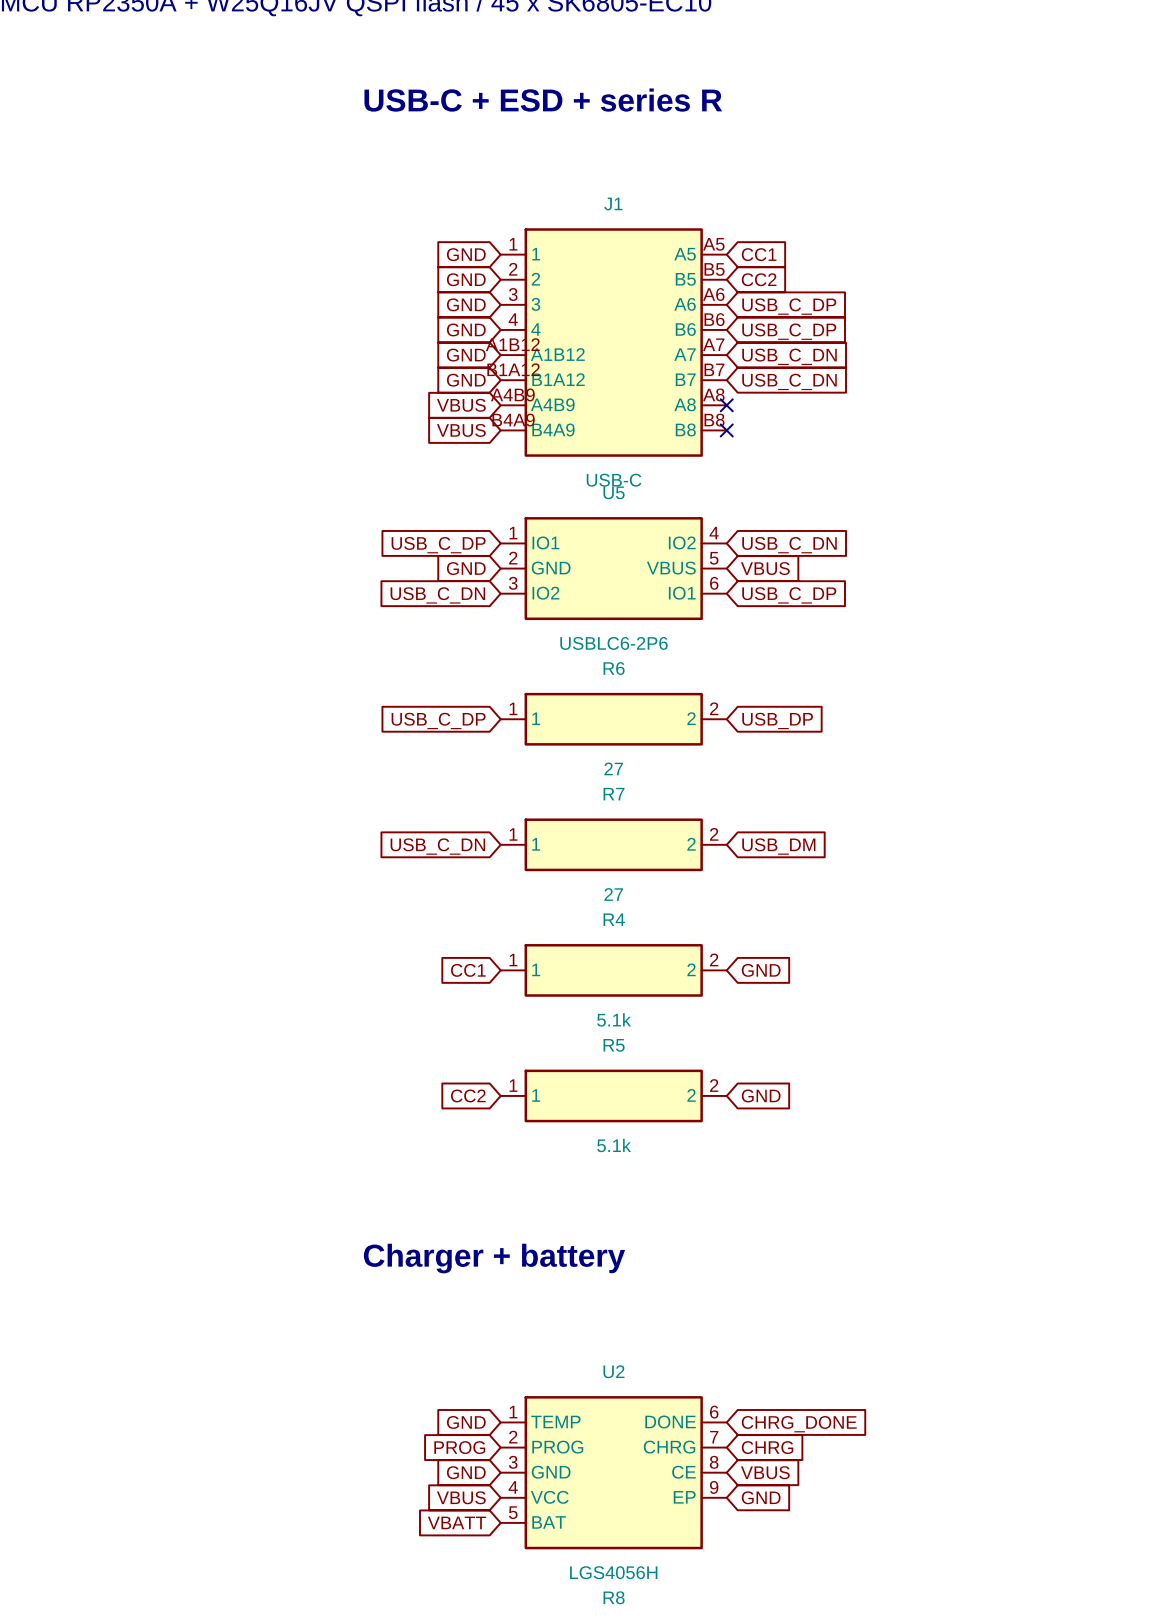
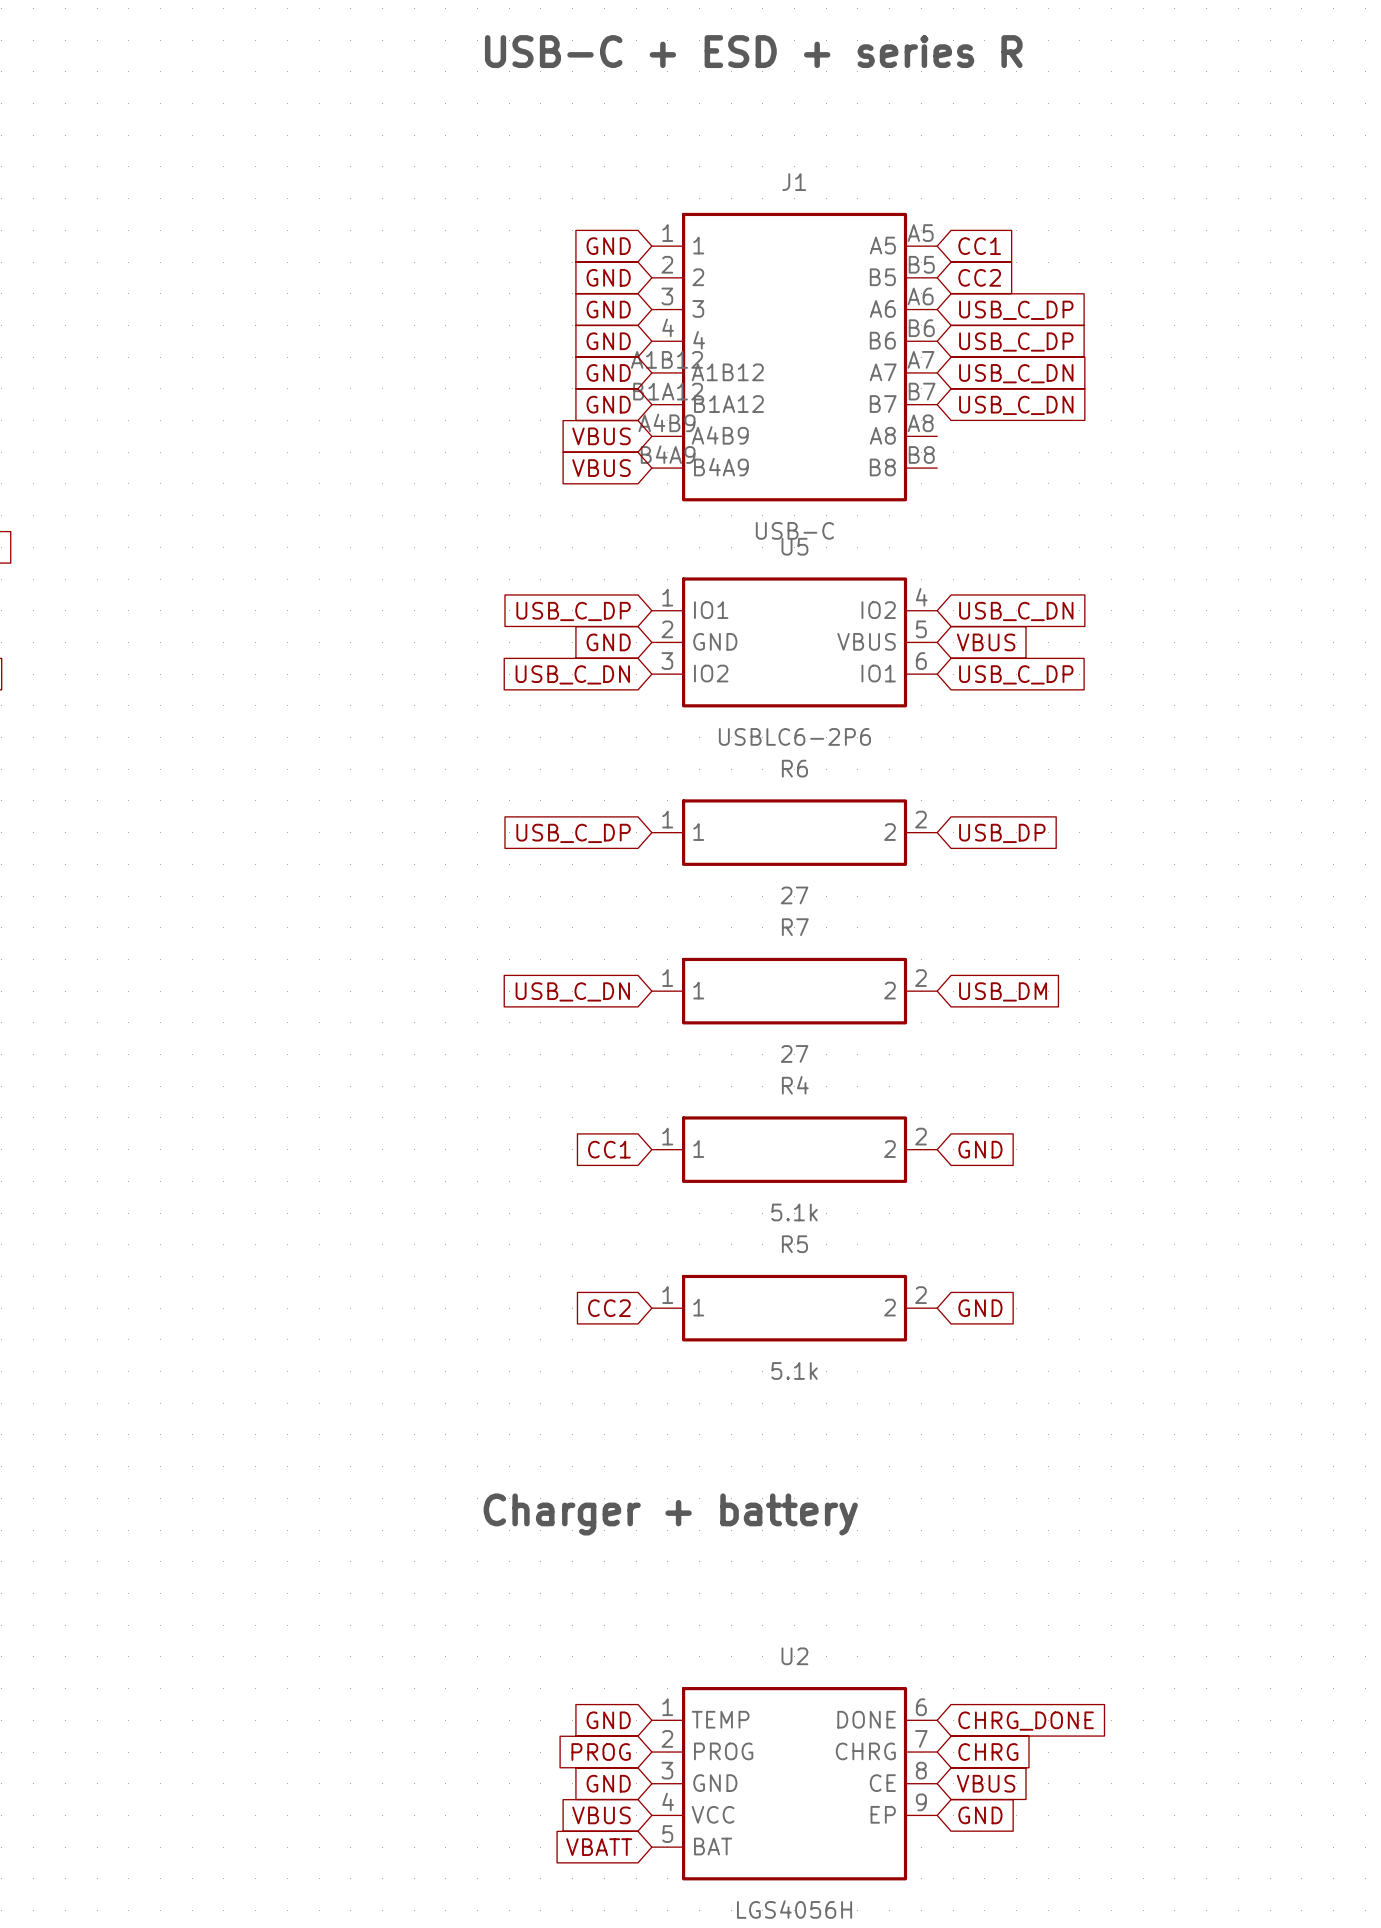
no-connect mark: (726, 405) -> none
no-connect mark: (726, 430) -> none

